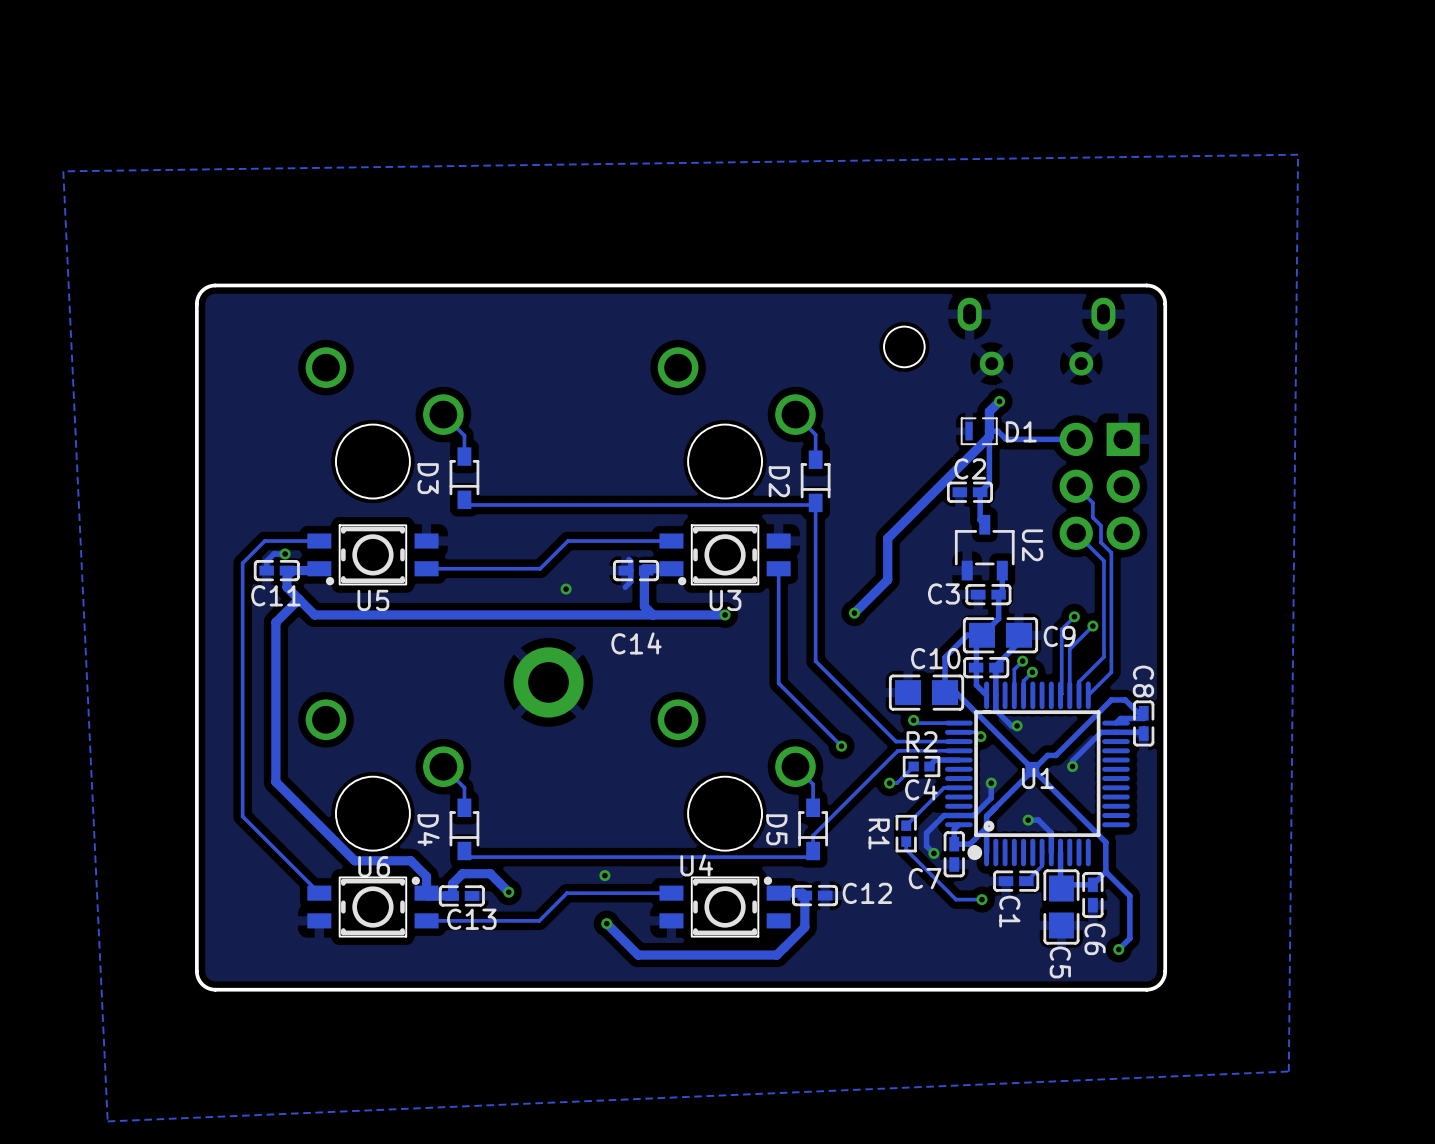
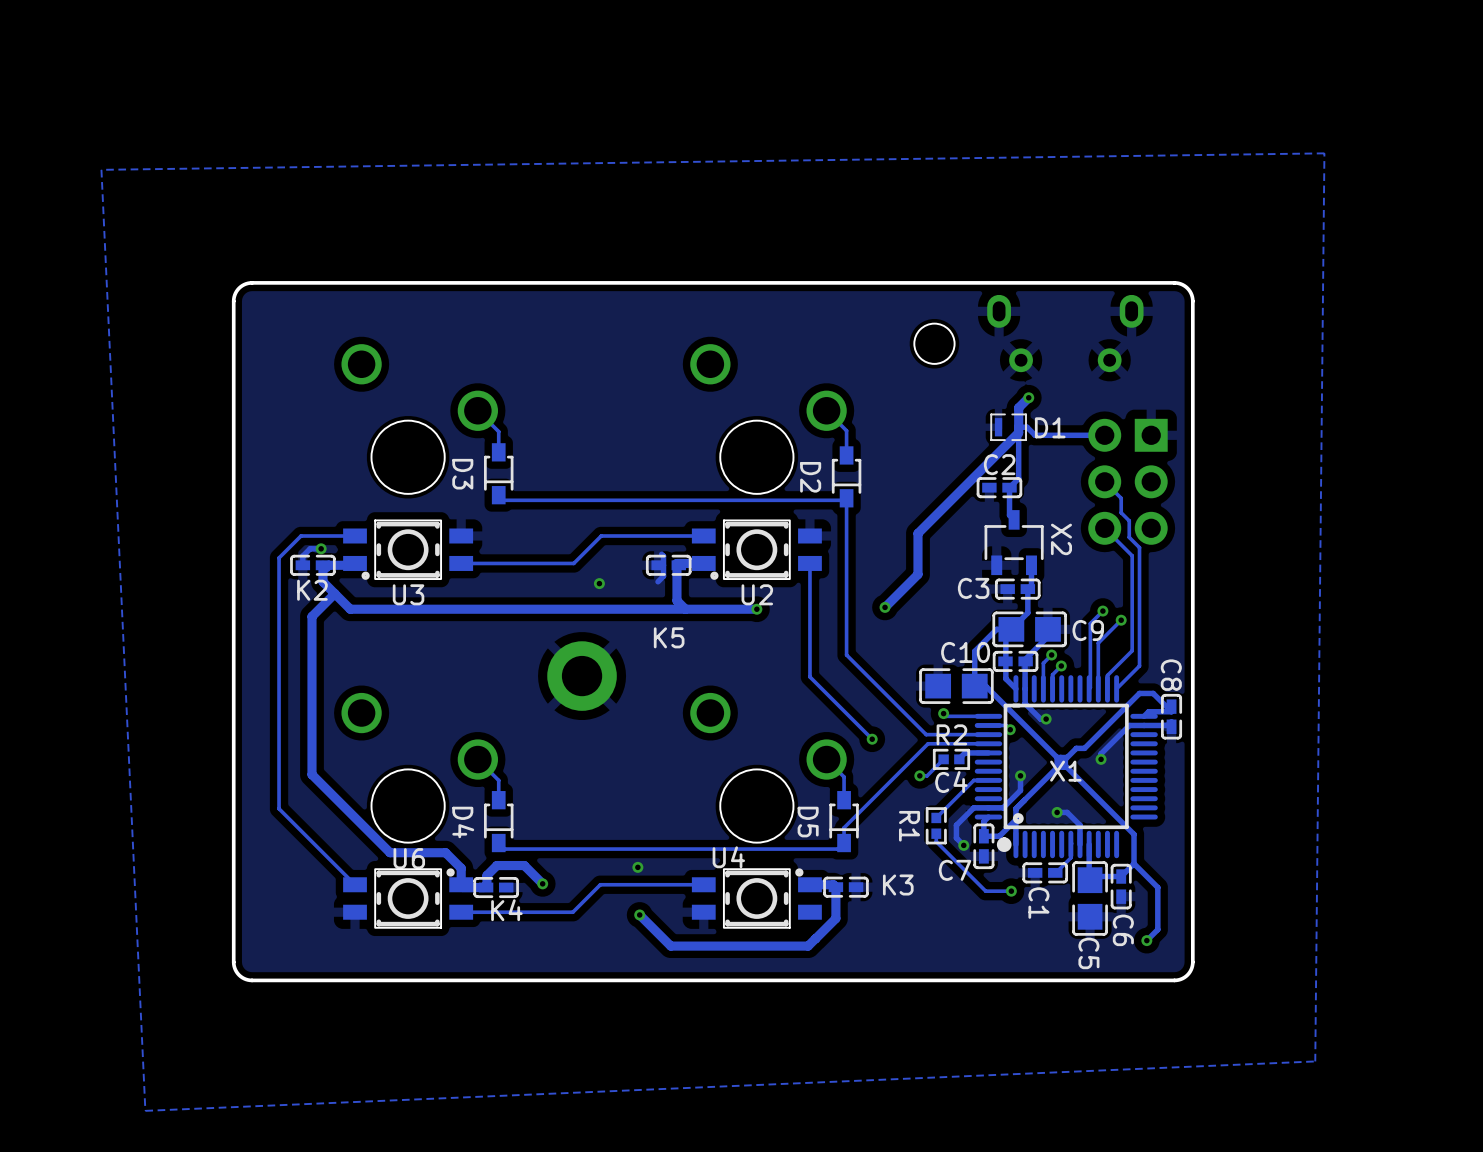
U2 name: U2 (1032, 545) -> X2 (1061, 539)
C11 name: C11 (275, 595) -> K2 (312, 590)
U5 name: U5 (373, 600) -> U3 (408, 594)
U3 name: U3 (725, 600) -> U2 (757, 594)
C14 name: C14 (636, 643) -> K5 (669, 637)
U1 name: U1 (1037, 778) -> X1 (1065, 771)
C12 name: C12 (867, 893) -> K3 (898, 884)
C13 name: C13 (471, 919) -> K4 (506, 910)

